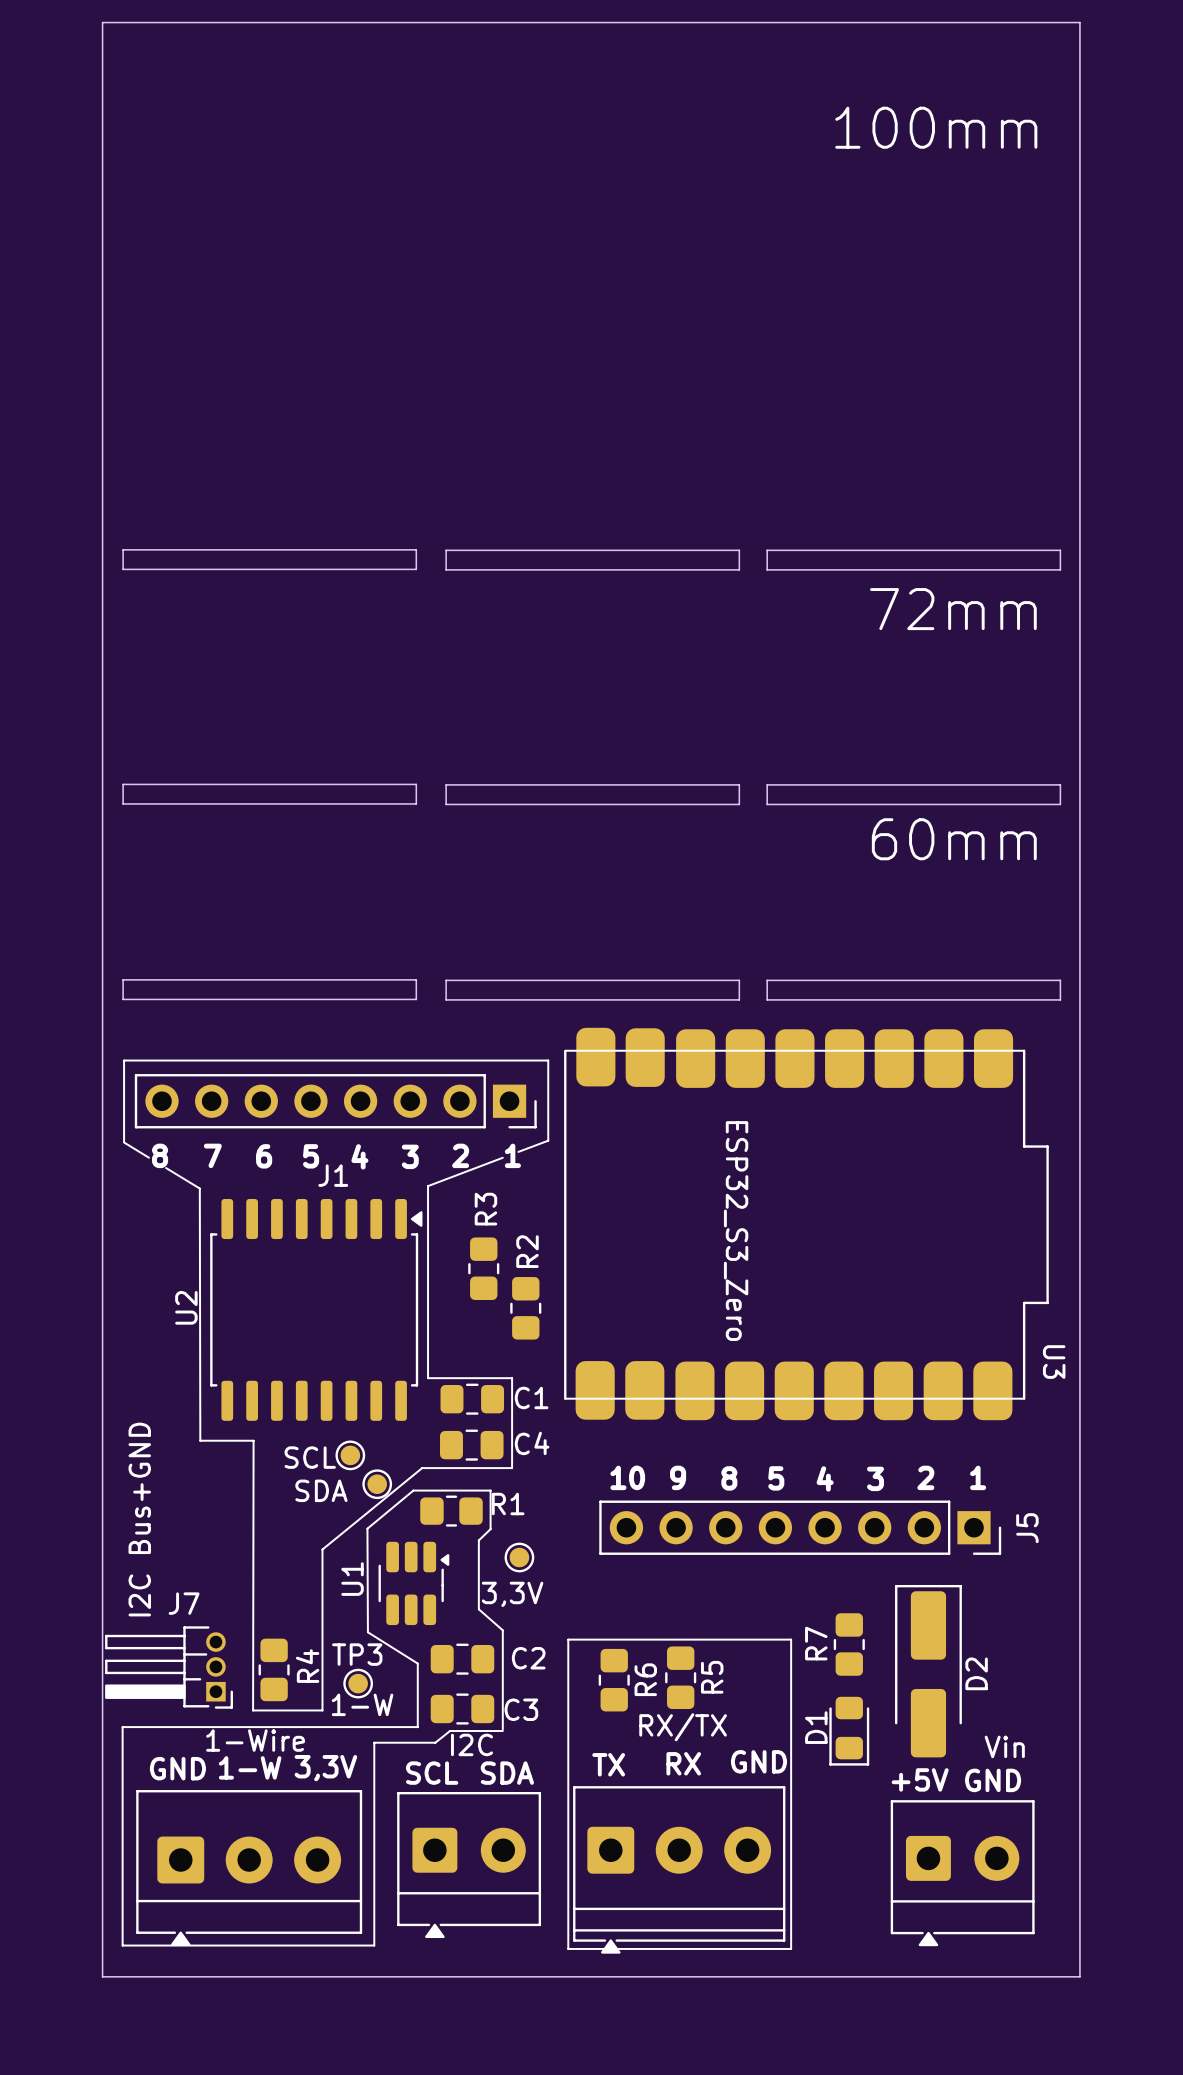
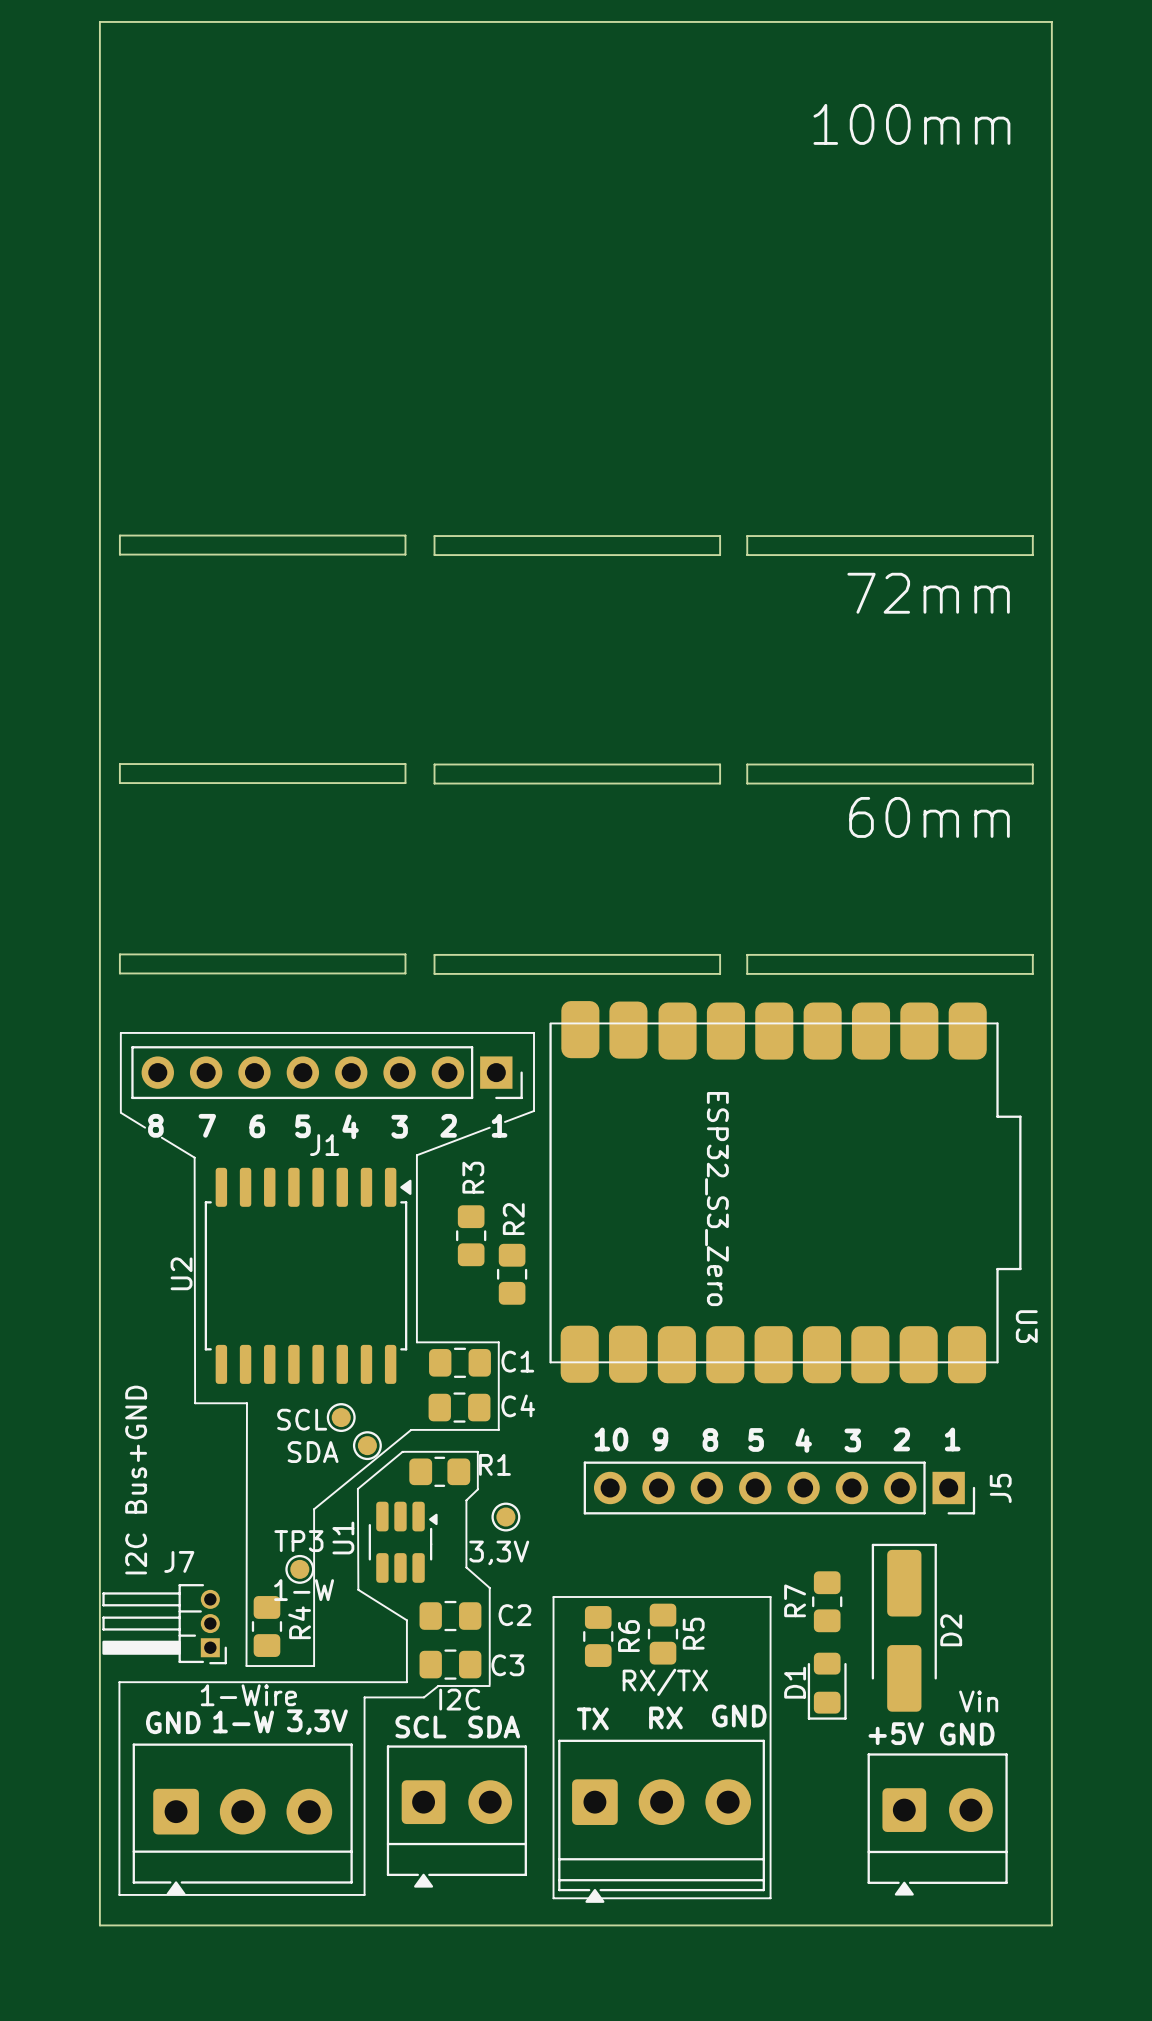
TP3 position: (358, 1683) -> (299, 1569)

